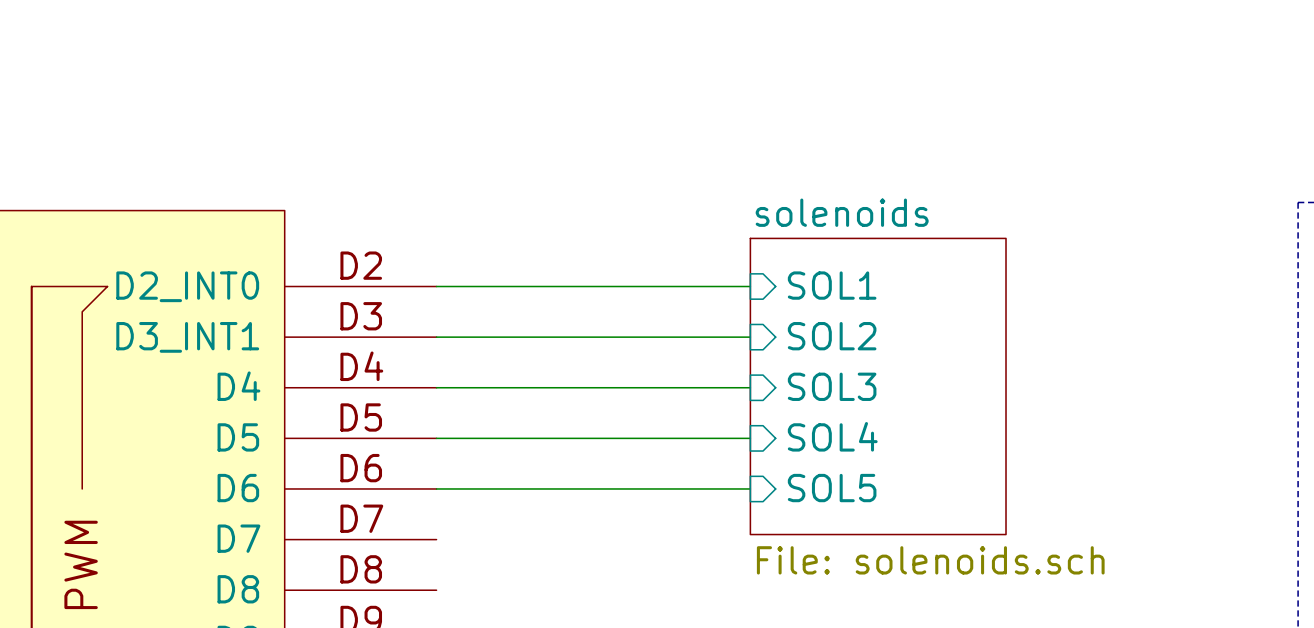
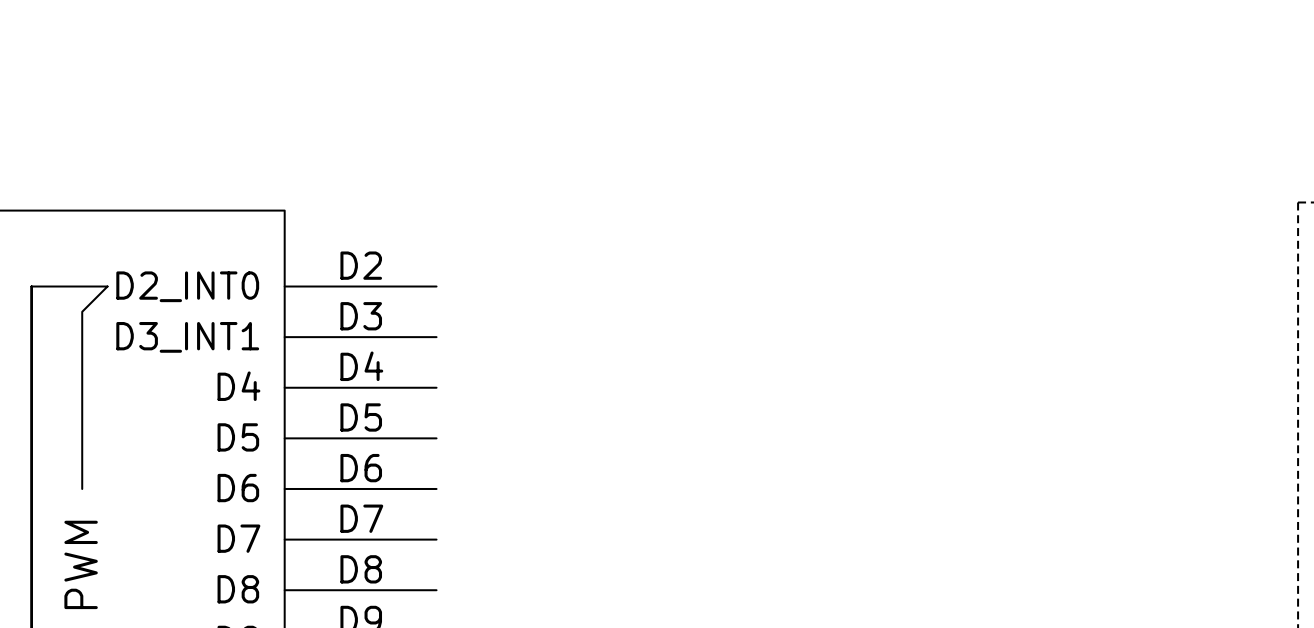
sheet pin: SOL1 (832, 285) -> none
wire: (436, 286) (750, 286) -> none
sheet pin: SOL2 (832, 336) -> none
wire: (436, 337) (750, 337) -> none
sheet pin: SOL3 (832, 386) -> none
sheet solenoids: File: solenoids.sch (878, 386) -> none
wire: (436, 387) (750, 387) -> none
sheet pin: SOL4 (832, 436) -> none
wire: (436, 438) (750, 438) -> none
wire: (436, 488) (750, 488) -> none
sheet pin: SOL5 (832, 488) -> none

